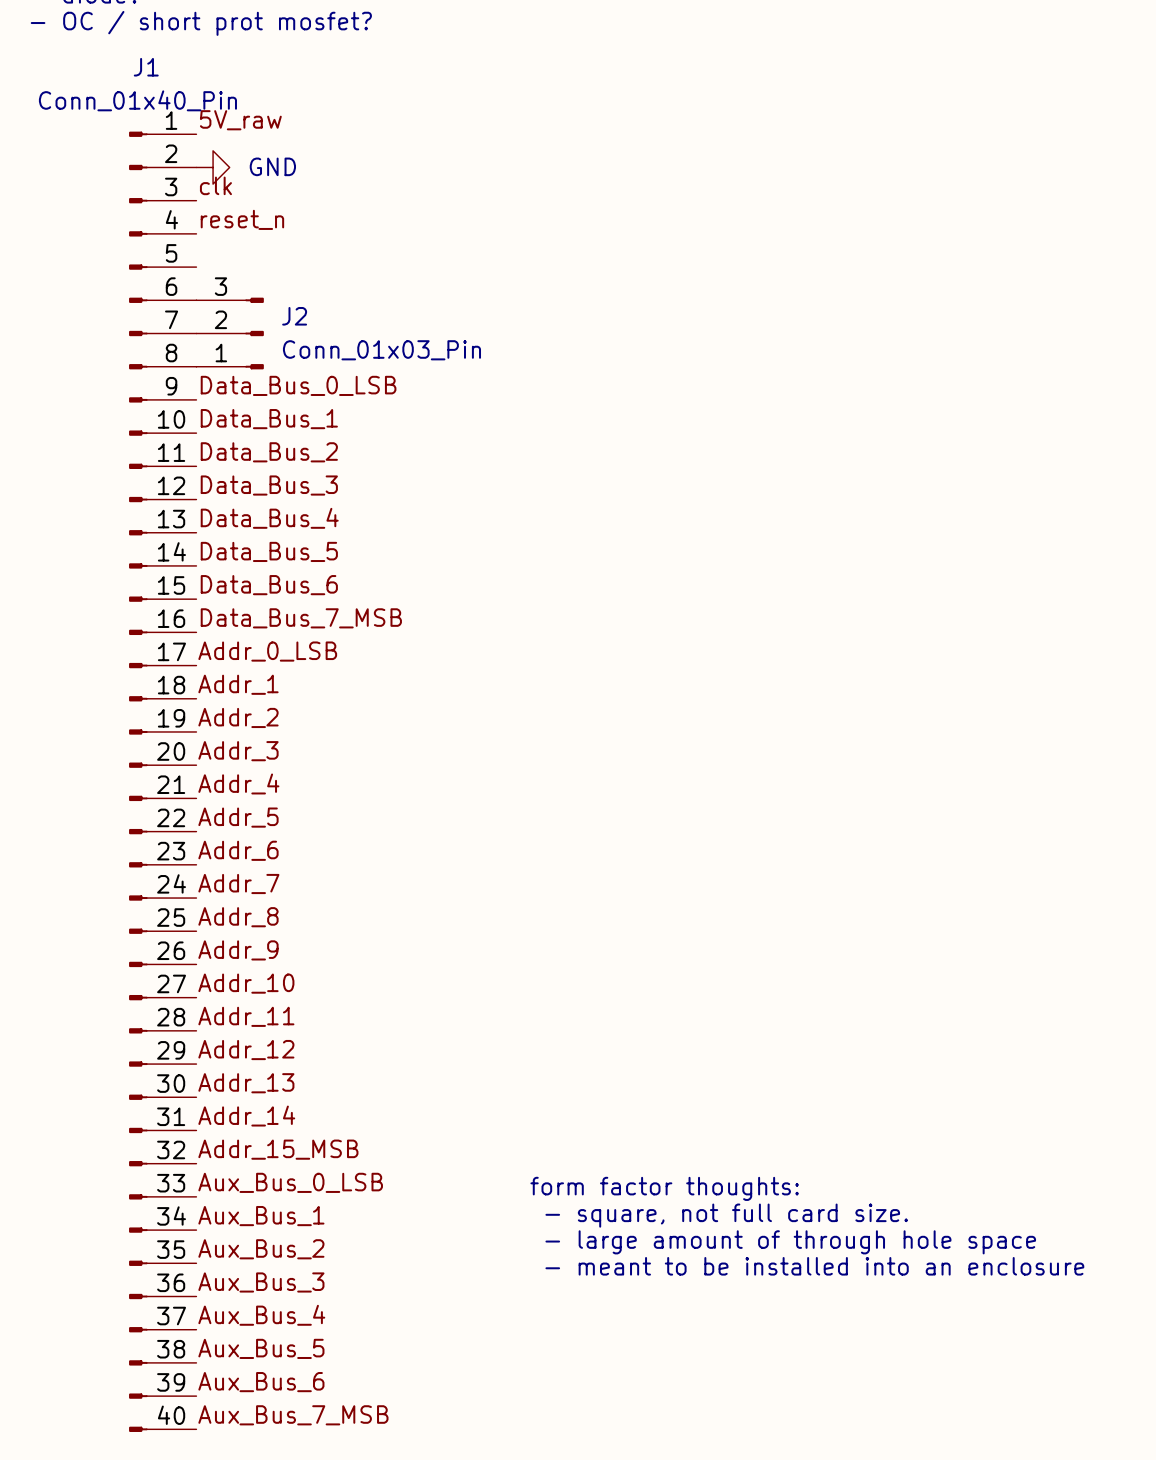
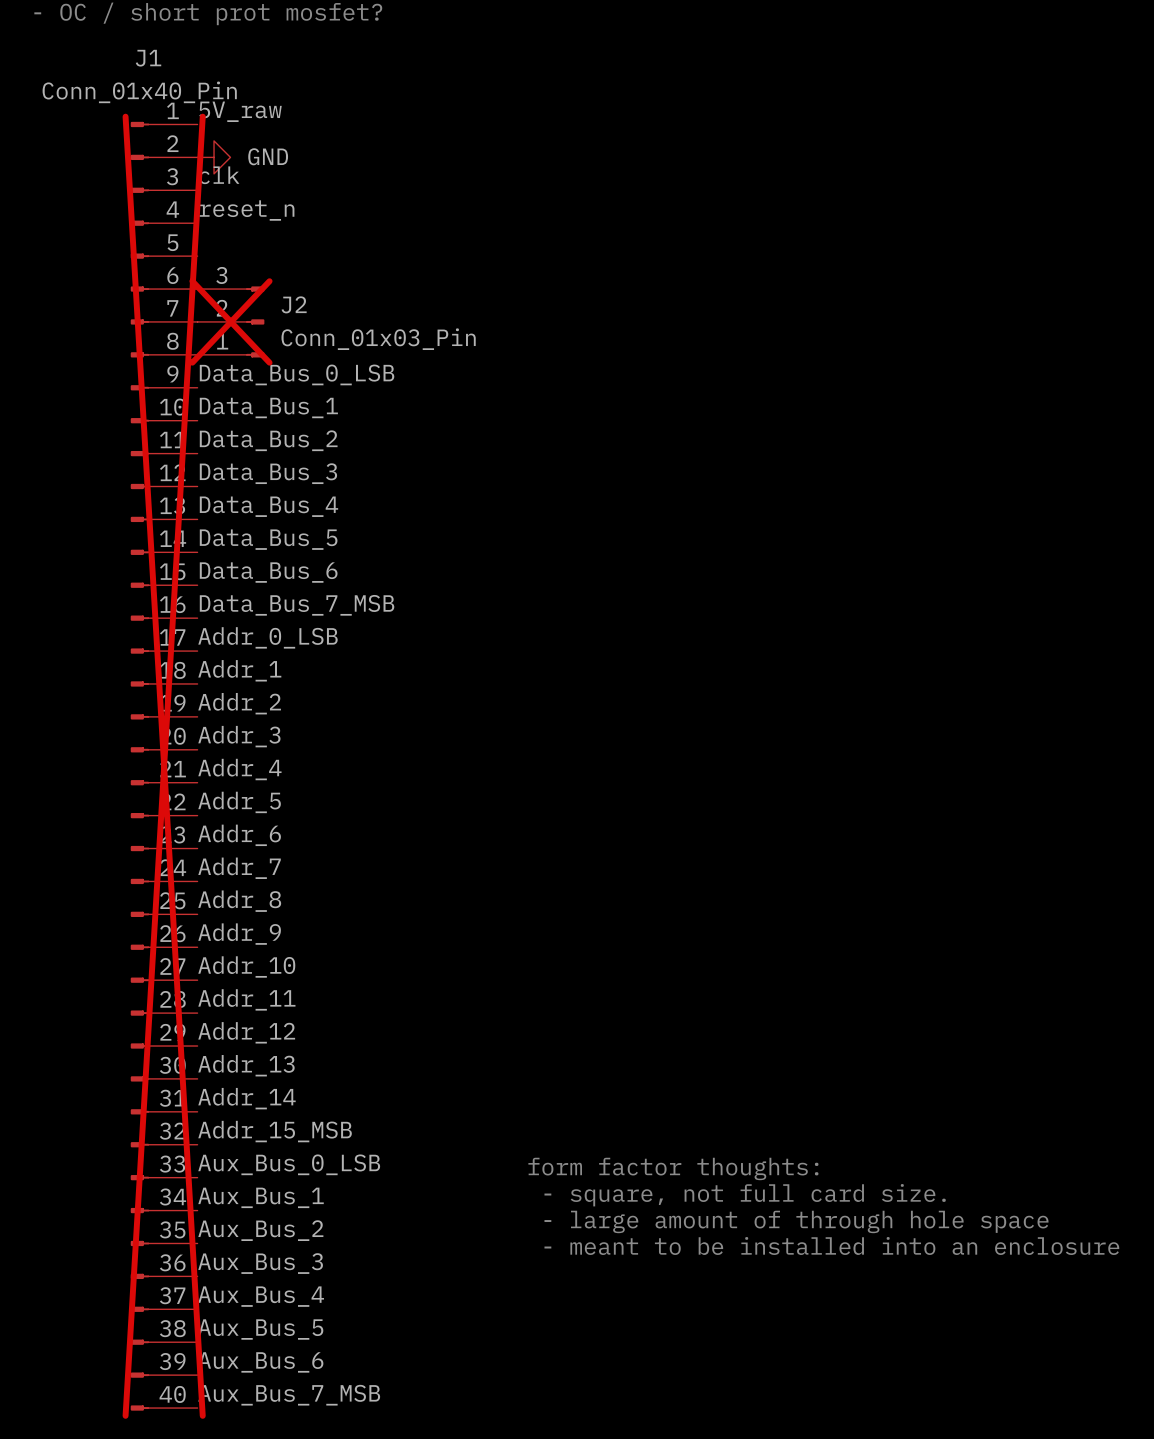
J2 do-not-place cross: none -> (230, 321)
J1 do-not-place cross: none -> (164, 766)

